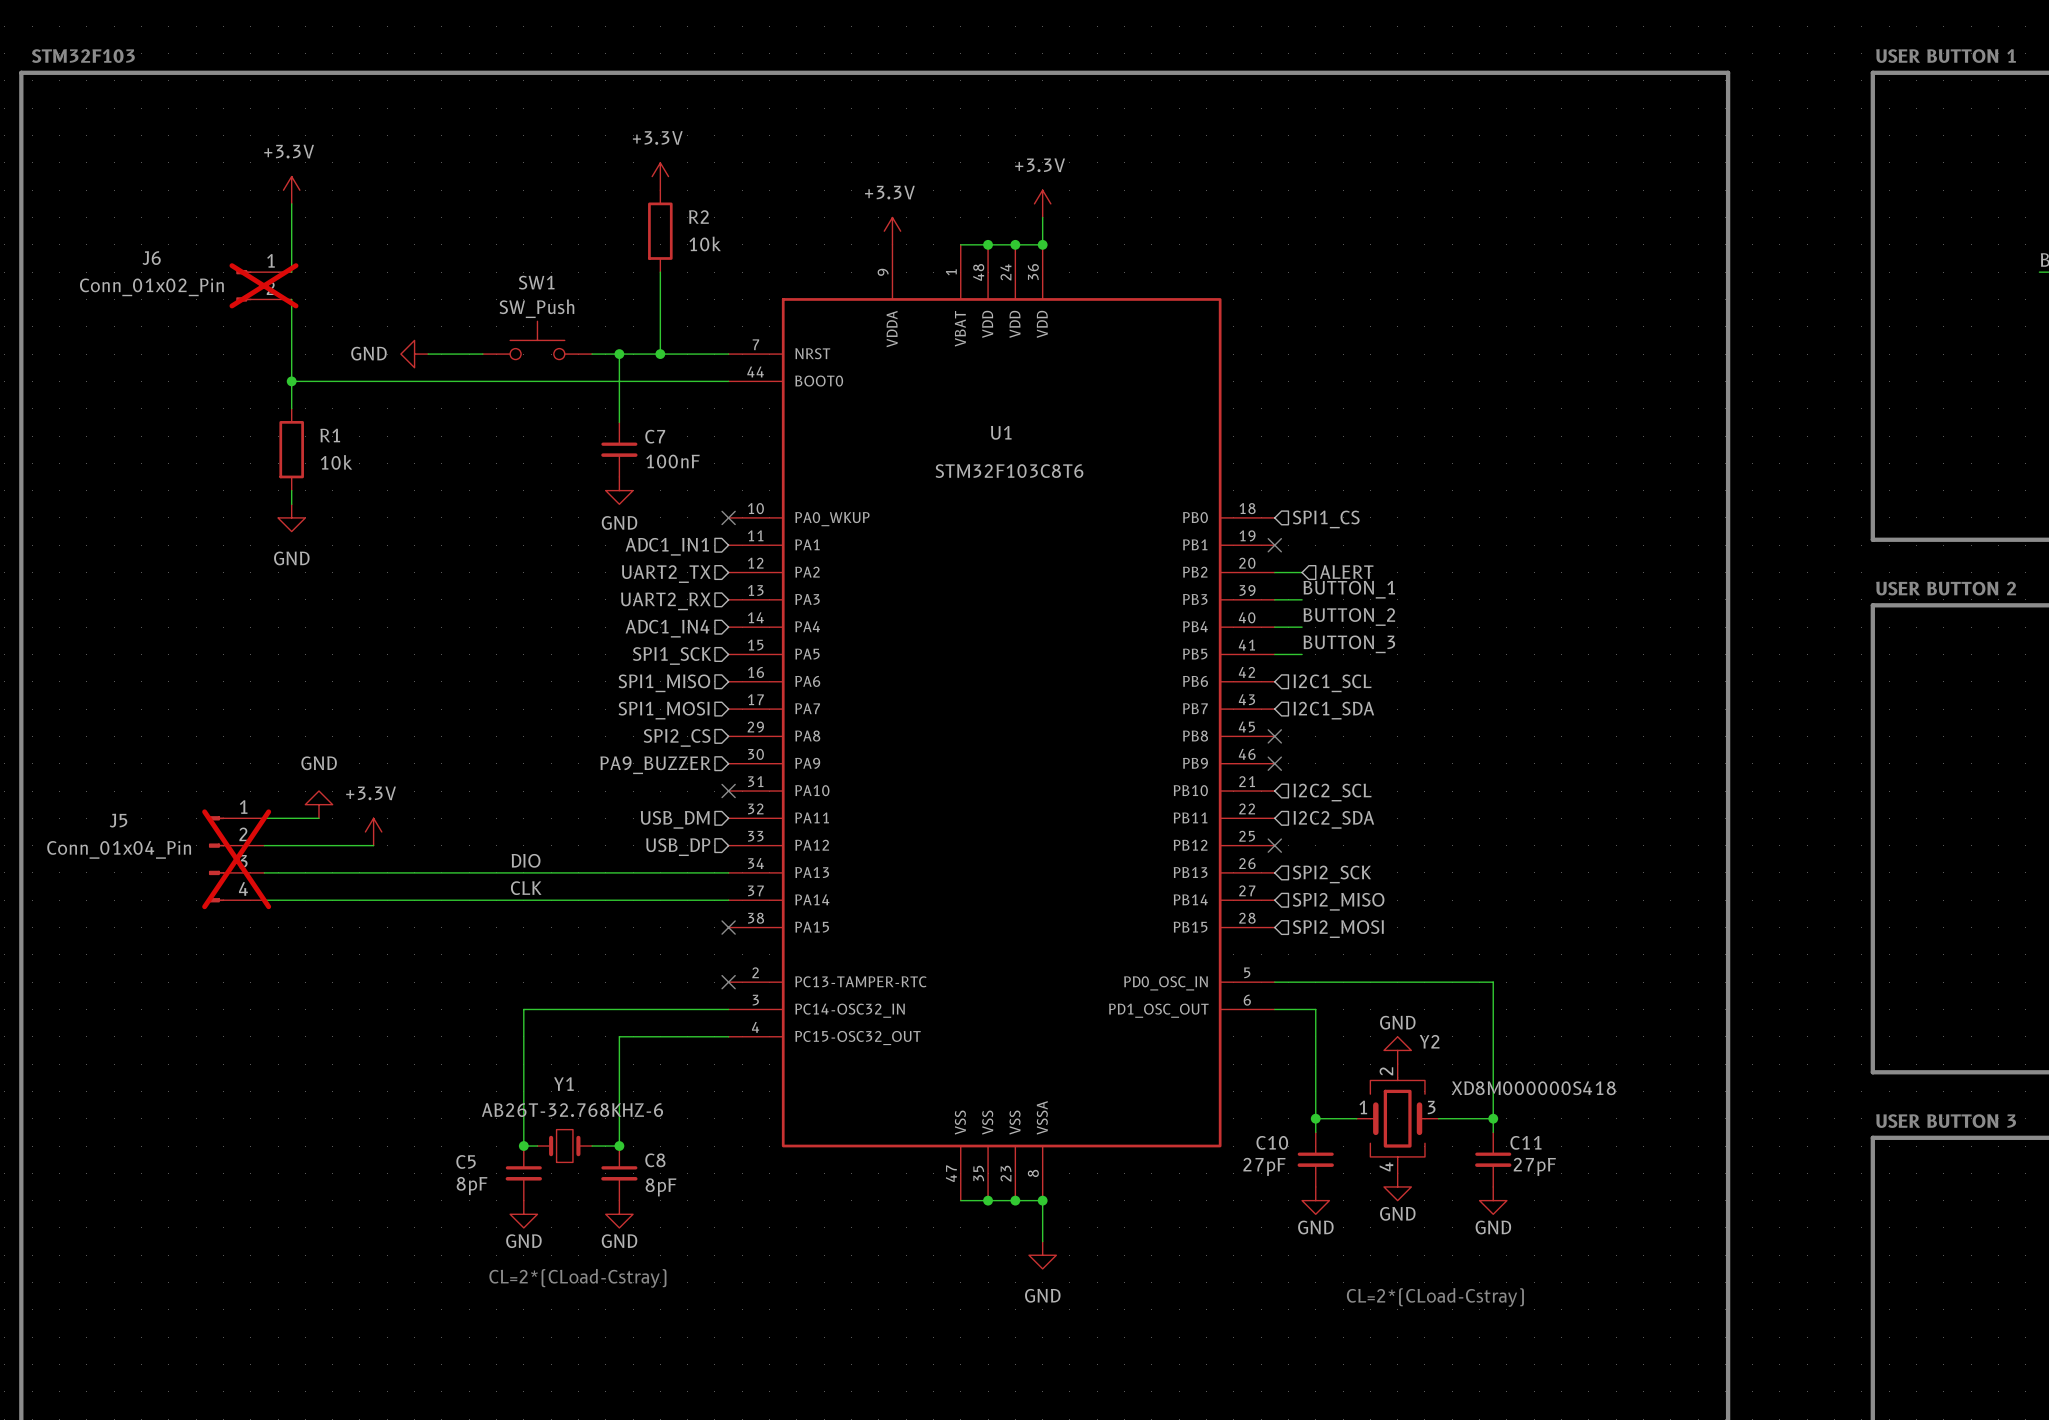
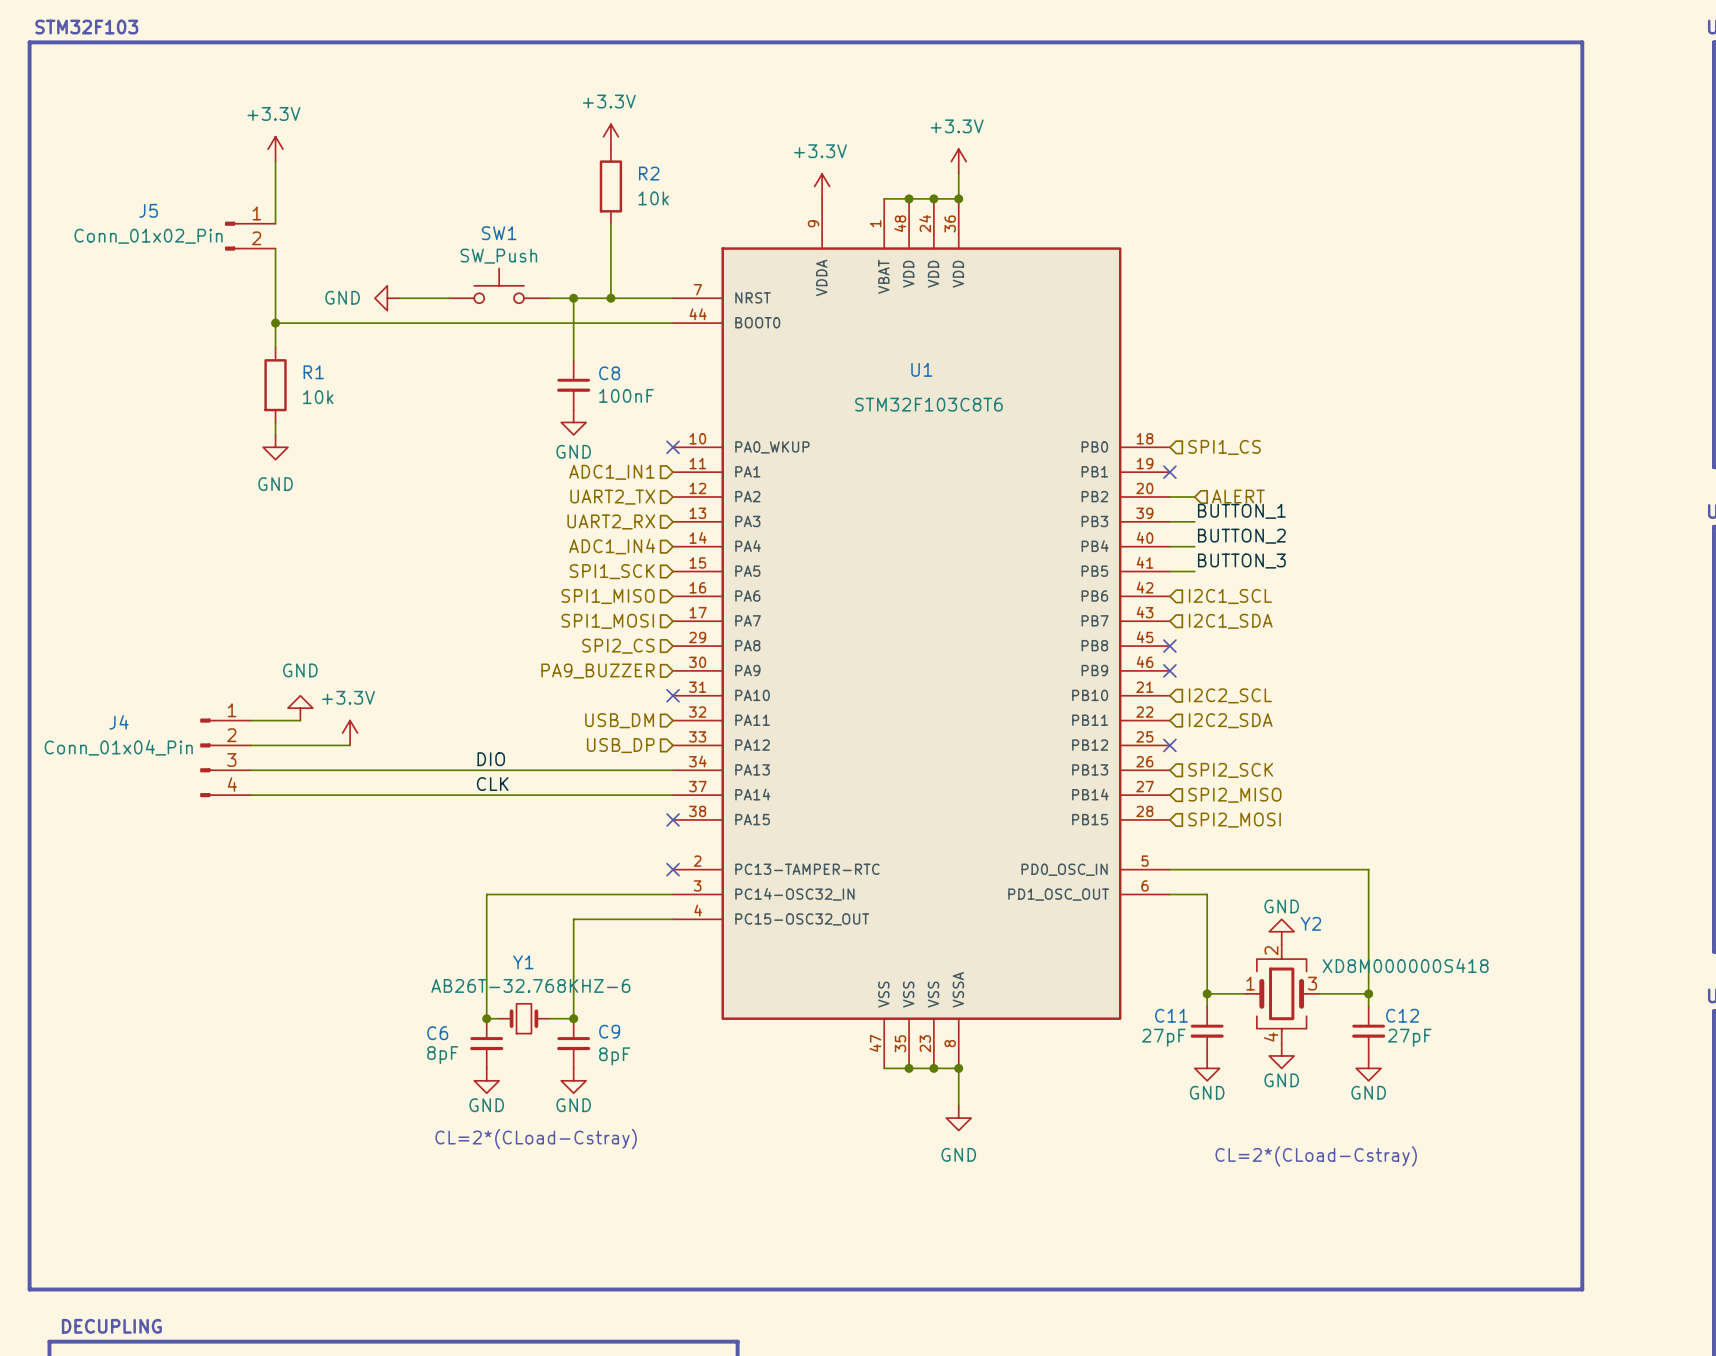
J6 name: J6 (151, 258) -> J5 (148, 210)
J6 do-not-place cross: (263, 285) -> none
C7 name: C7 (655, 436) -> C8 (609, 373)
J5 name: J5 (118, 820) -> J4 (119, 722)
J5 do-not-place cross: (236, 859) -> none
C10 name: C10 (1272, 1142) -> C11 (1171, 1015)
C11 name: C11 (1525, 1142) -> C12 (1402, 1015)
C8 name: C8 (655, 1160) -> C9 (609, 1031)
C5 name: C5 (466, 1161) -> C6 (437, 1033)

